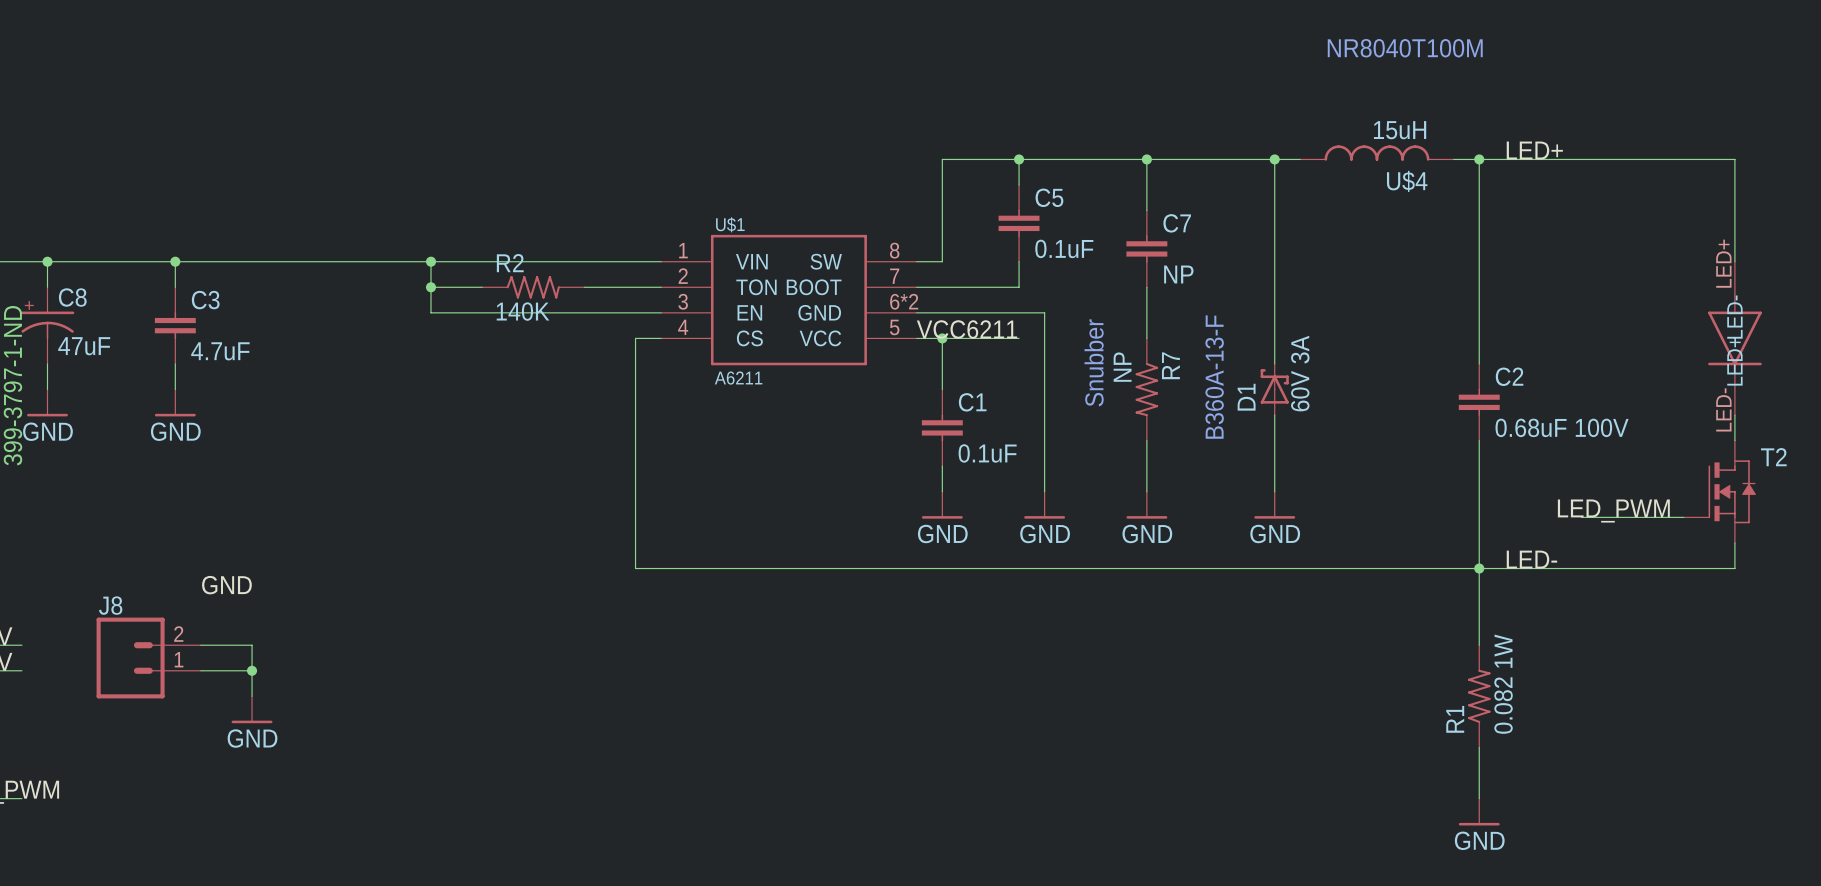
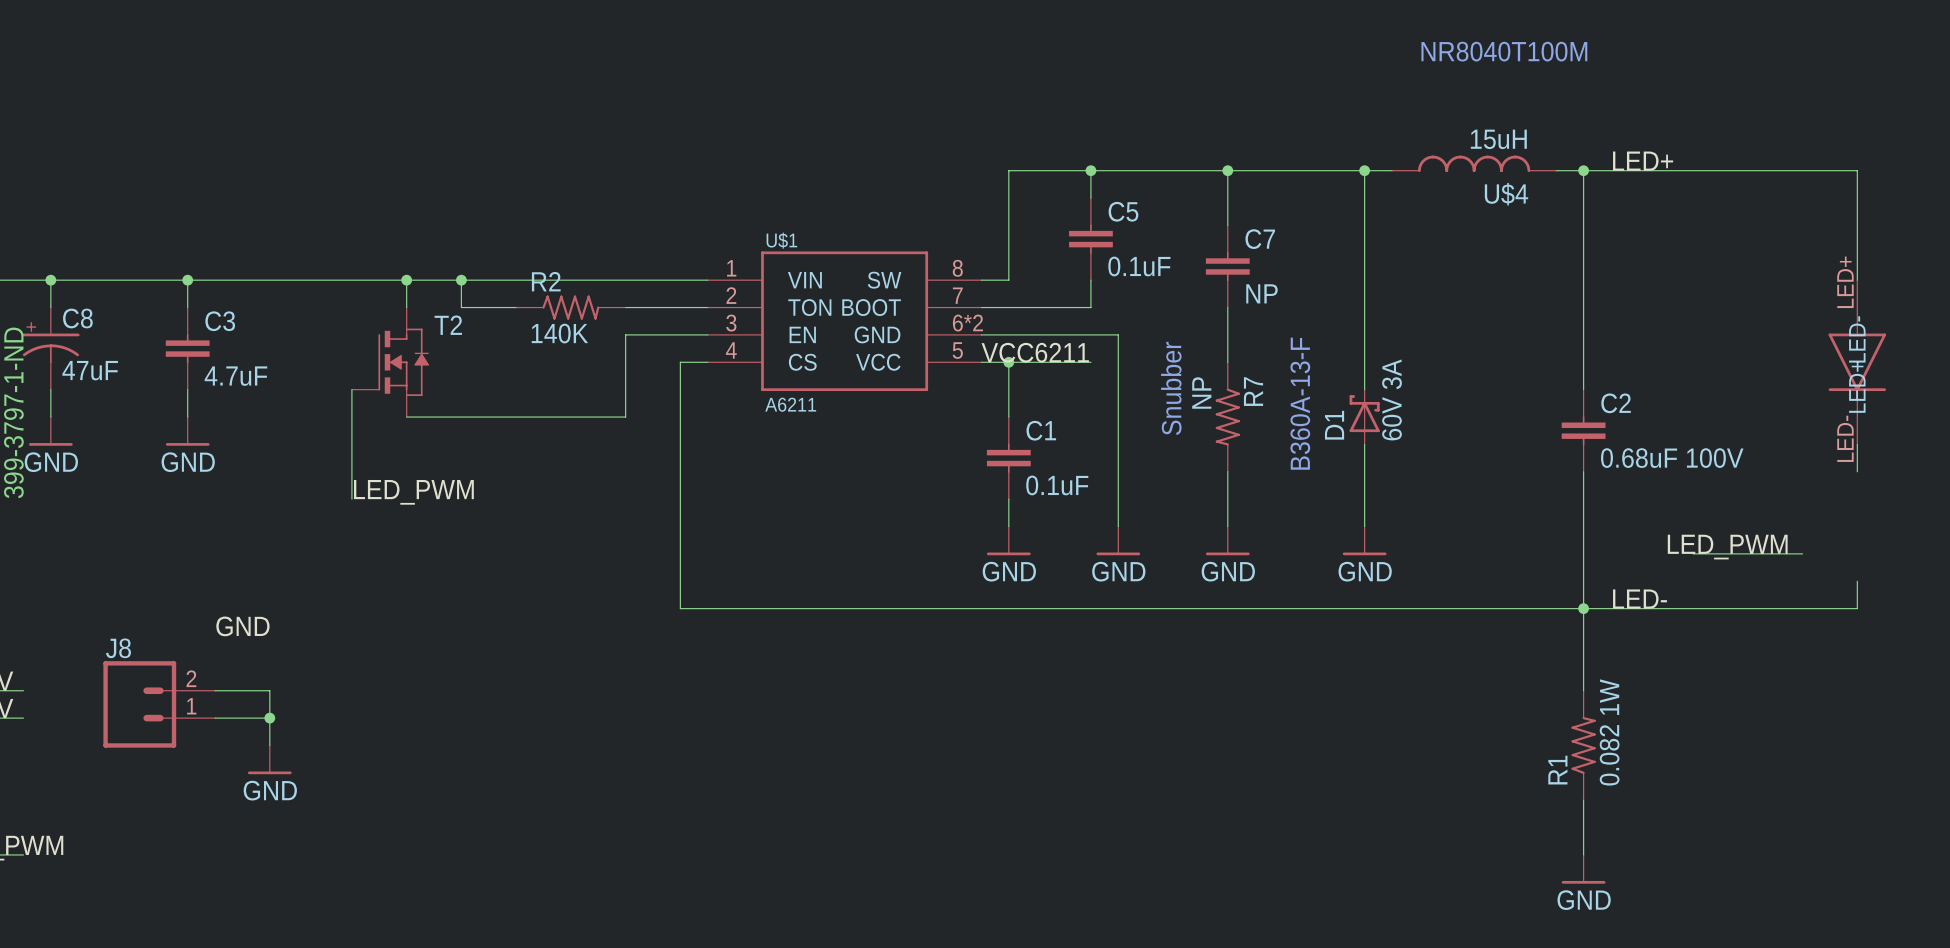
wire: none -> (406, 280) (406, 307)
wire: (431, 287) (431, 312) (584, 312) -> (406, 417) (625, 417) (625, 334)
junction position: (431, 287) -> (406, 280)
wire: none -> (351, 389) (351, 499)
label: none -> LED_PWM (413, 492)
T2 position: (1719, 491) -> (390, 362)

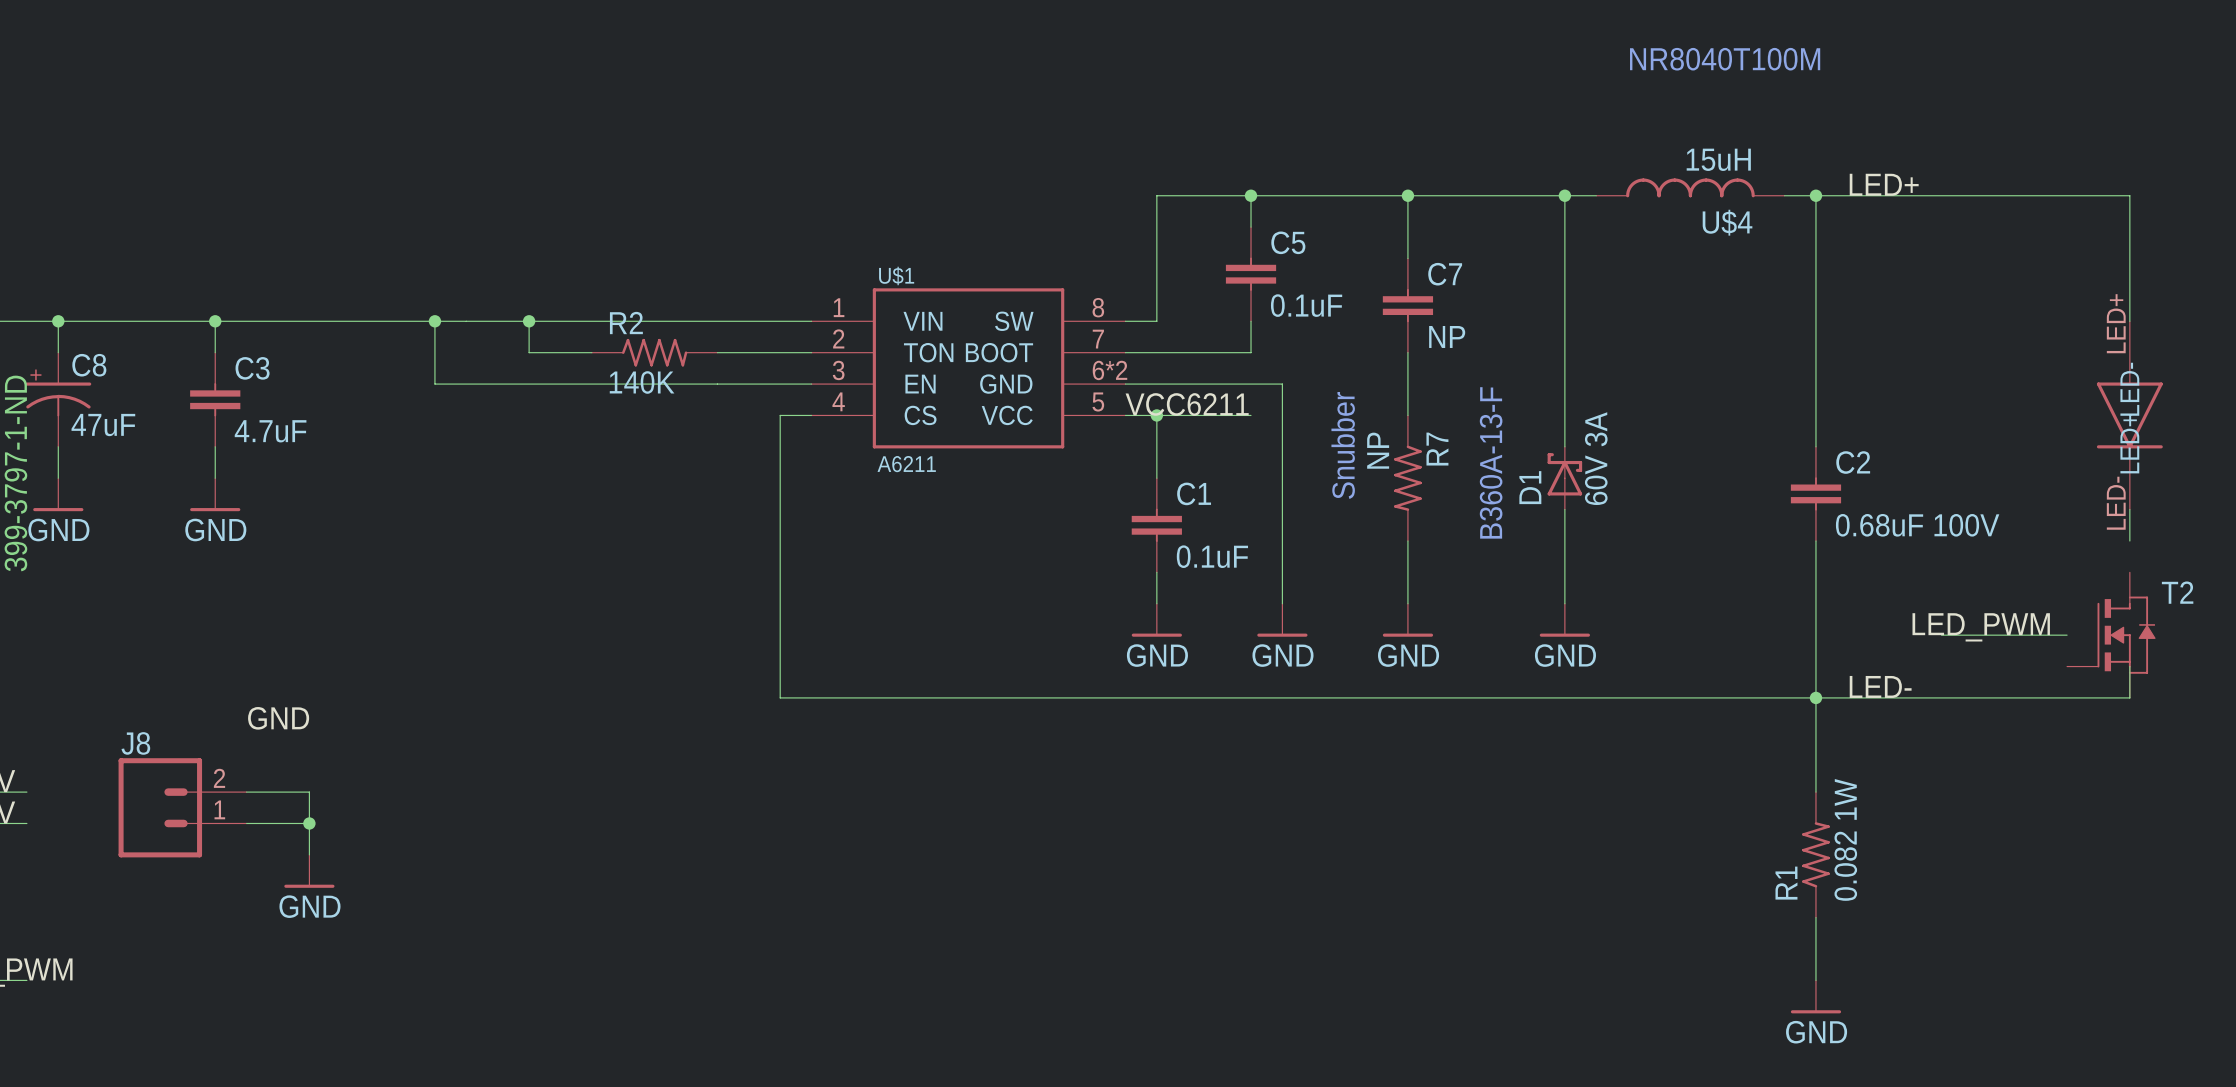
wire: (406, 280) (406, 307) -> none
junction position: (406, 280) -> (434, 321)
wire: (625, 334) (625, 417) (406, 417) -> (717, 384) (434, 384) (434, 321)
T2 position: (390, 362) -> (2111, 635)
wire: (351, 389) (351, 499) -> none
label: LED_PWM (413, 492) -> none

